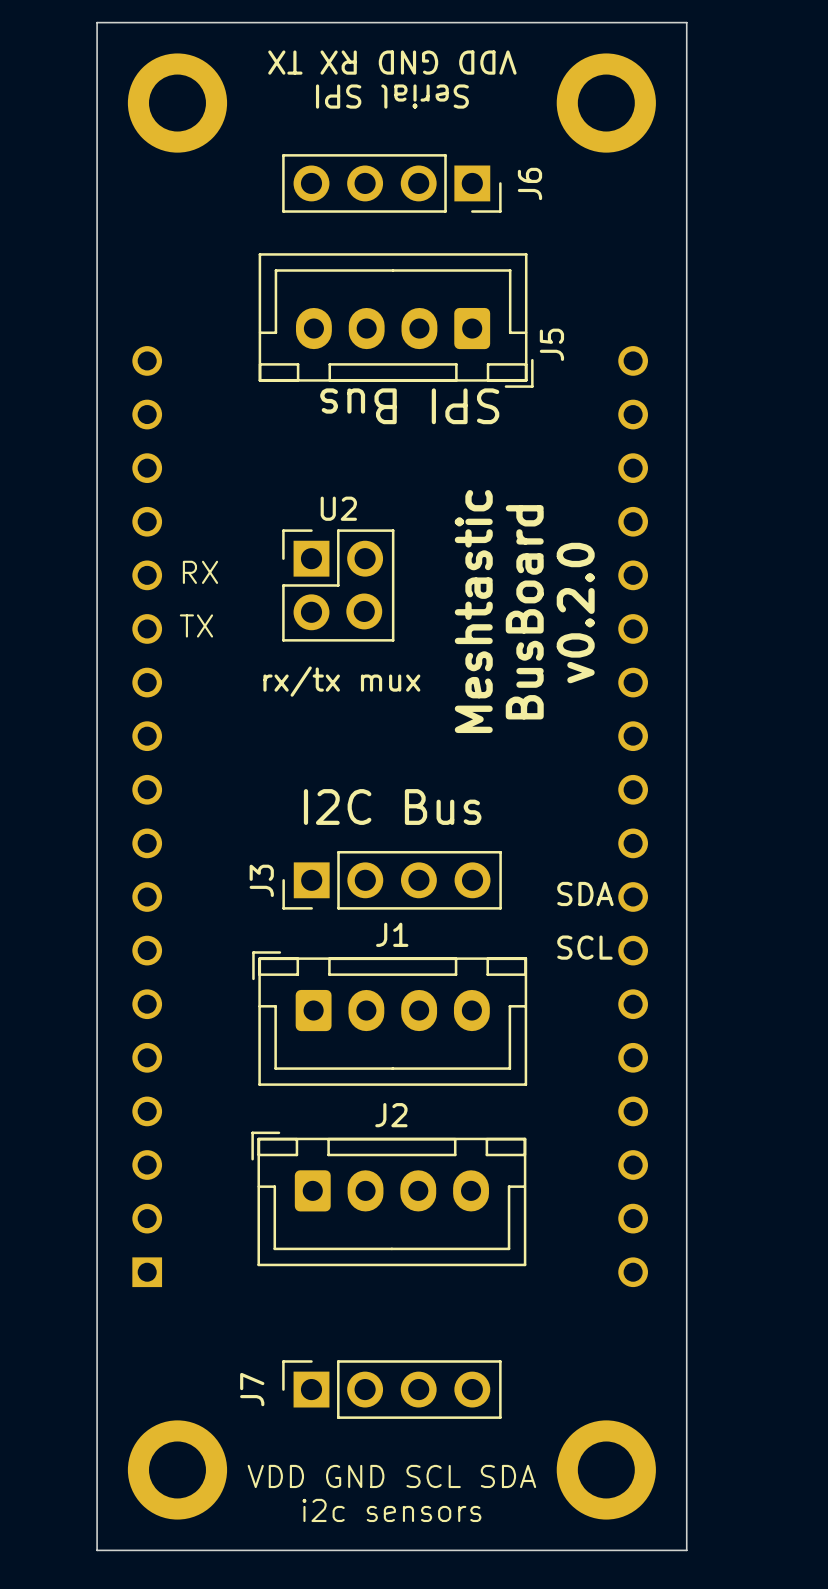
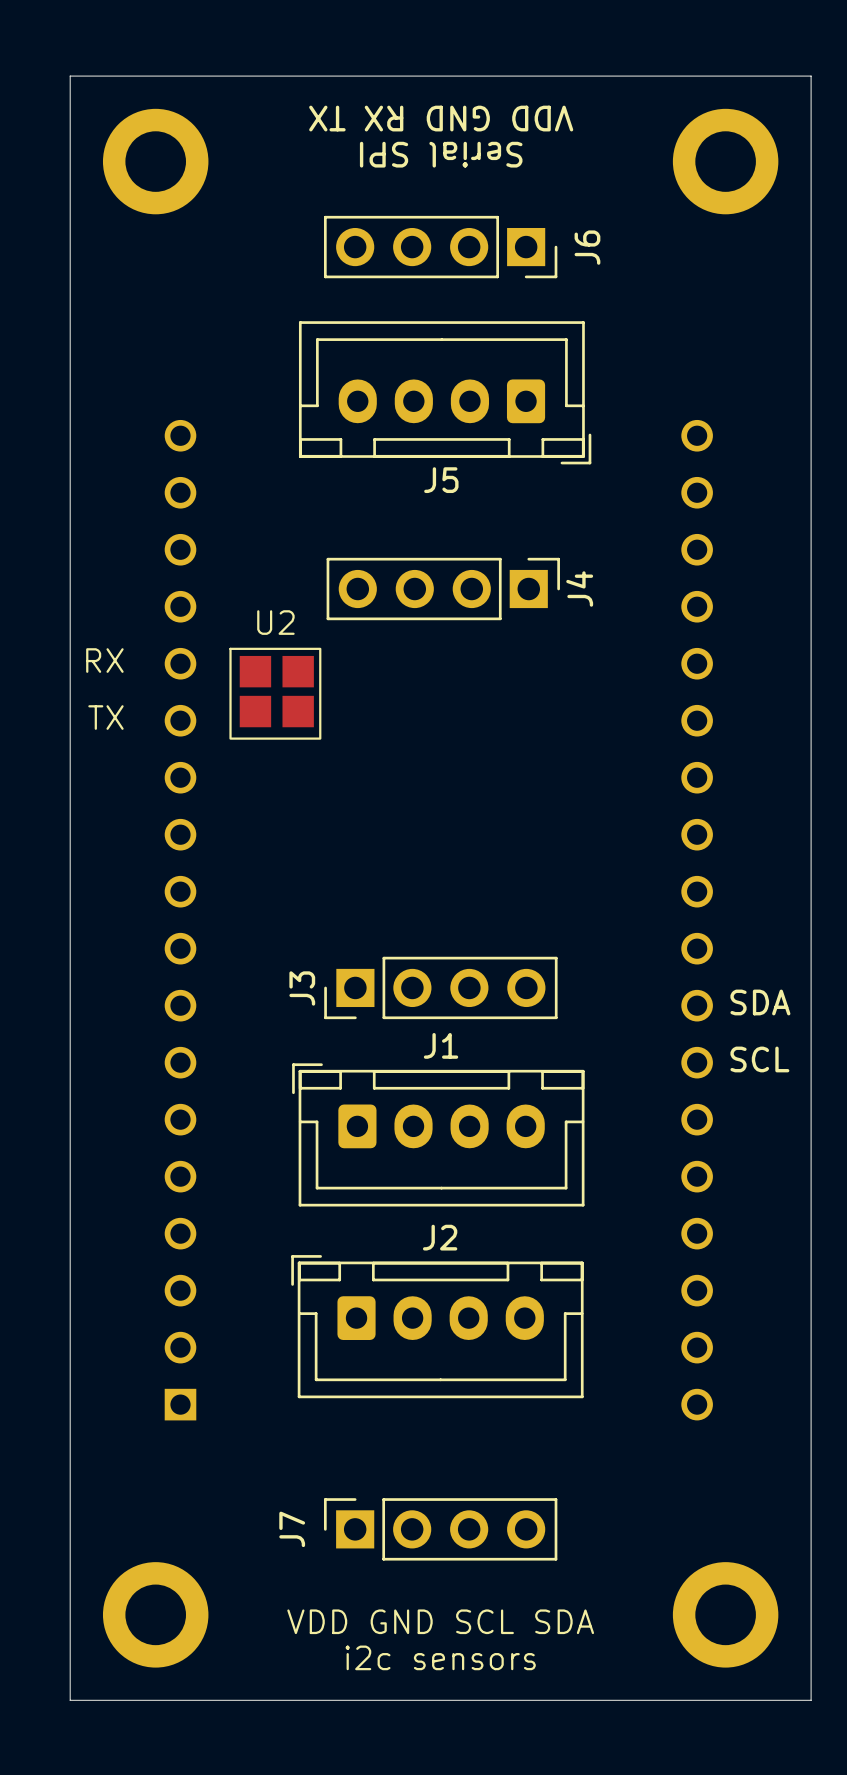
board edge: (97, 22) (97, 1550) -> (127, 76) (70, 76) (70, 1700) (127, 1700)
board edge: (686, 22) (686, 1550) -> (754, 76) (811, 76) (811, 1700) (754, 1700)
part position: (177, 103) -> (155, 161)
part position: (606, 103) -> (725, 161)
J5 name rotation: 0° (551, 344) -> 90° clockwise (441, 480)
J5 name position: J5 (551, 344) -> J5 (441, 480)
text: SPI Bus (409, 406) -> none
J4: none -> (443, 589)
U2 footprint: [282, 529, 395, 642] -> [229, 647, 322, 740]
text position: RX (200, 572) -> RX (104, 660)
text: Meshtastic (473, 611) -> none
text: BusBoard (524, 612) -> none
text: v0.2.0 (575, 613) -> none
text position: TX (196, 625) -> TX (105, 717)
text: rx/tx mux (341, 681) -> none
text: I2C Bus (392, 807) -> none
text position: SDA (585, 893) -> SDA (760, 1002)
text position: SCL (584, 947) -> SCL (759, 1059)
part position: (177, 1469) -> (155, 1614)
part position: (606, 1469) -> (725, 1614)

